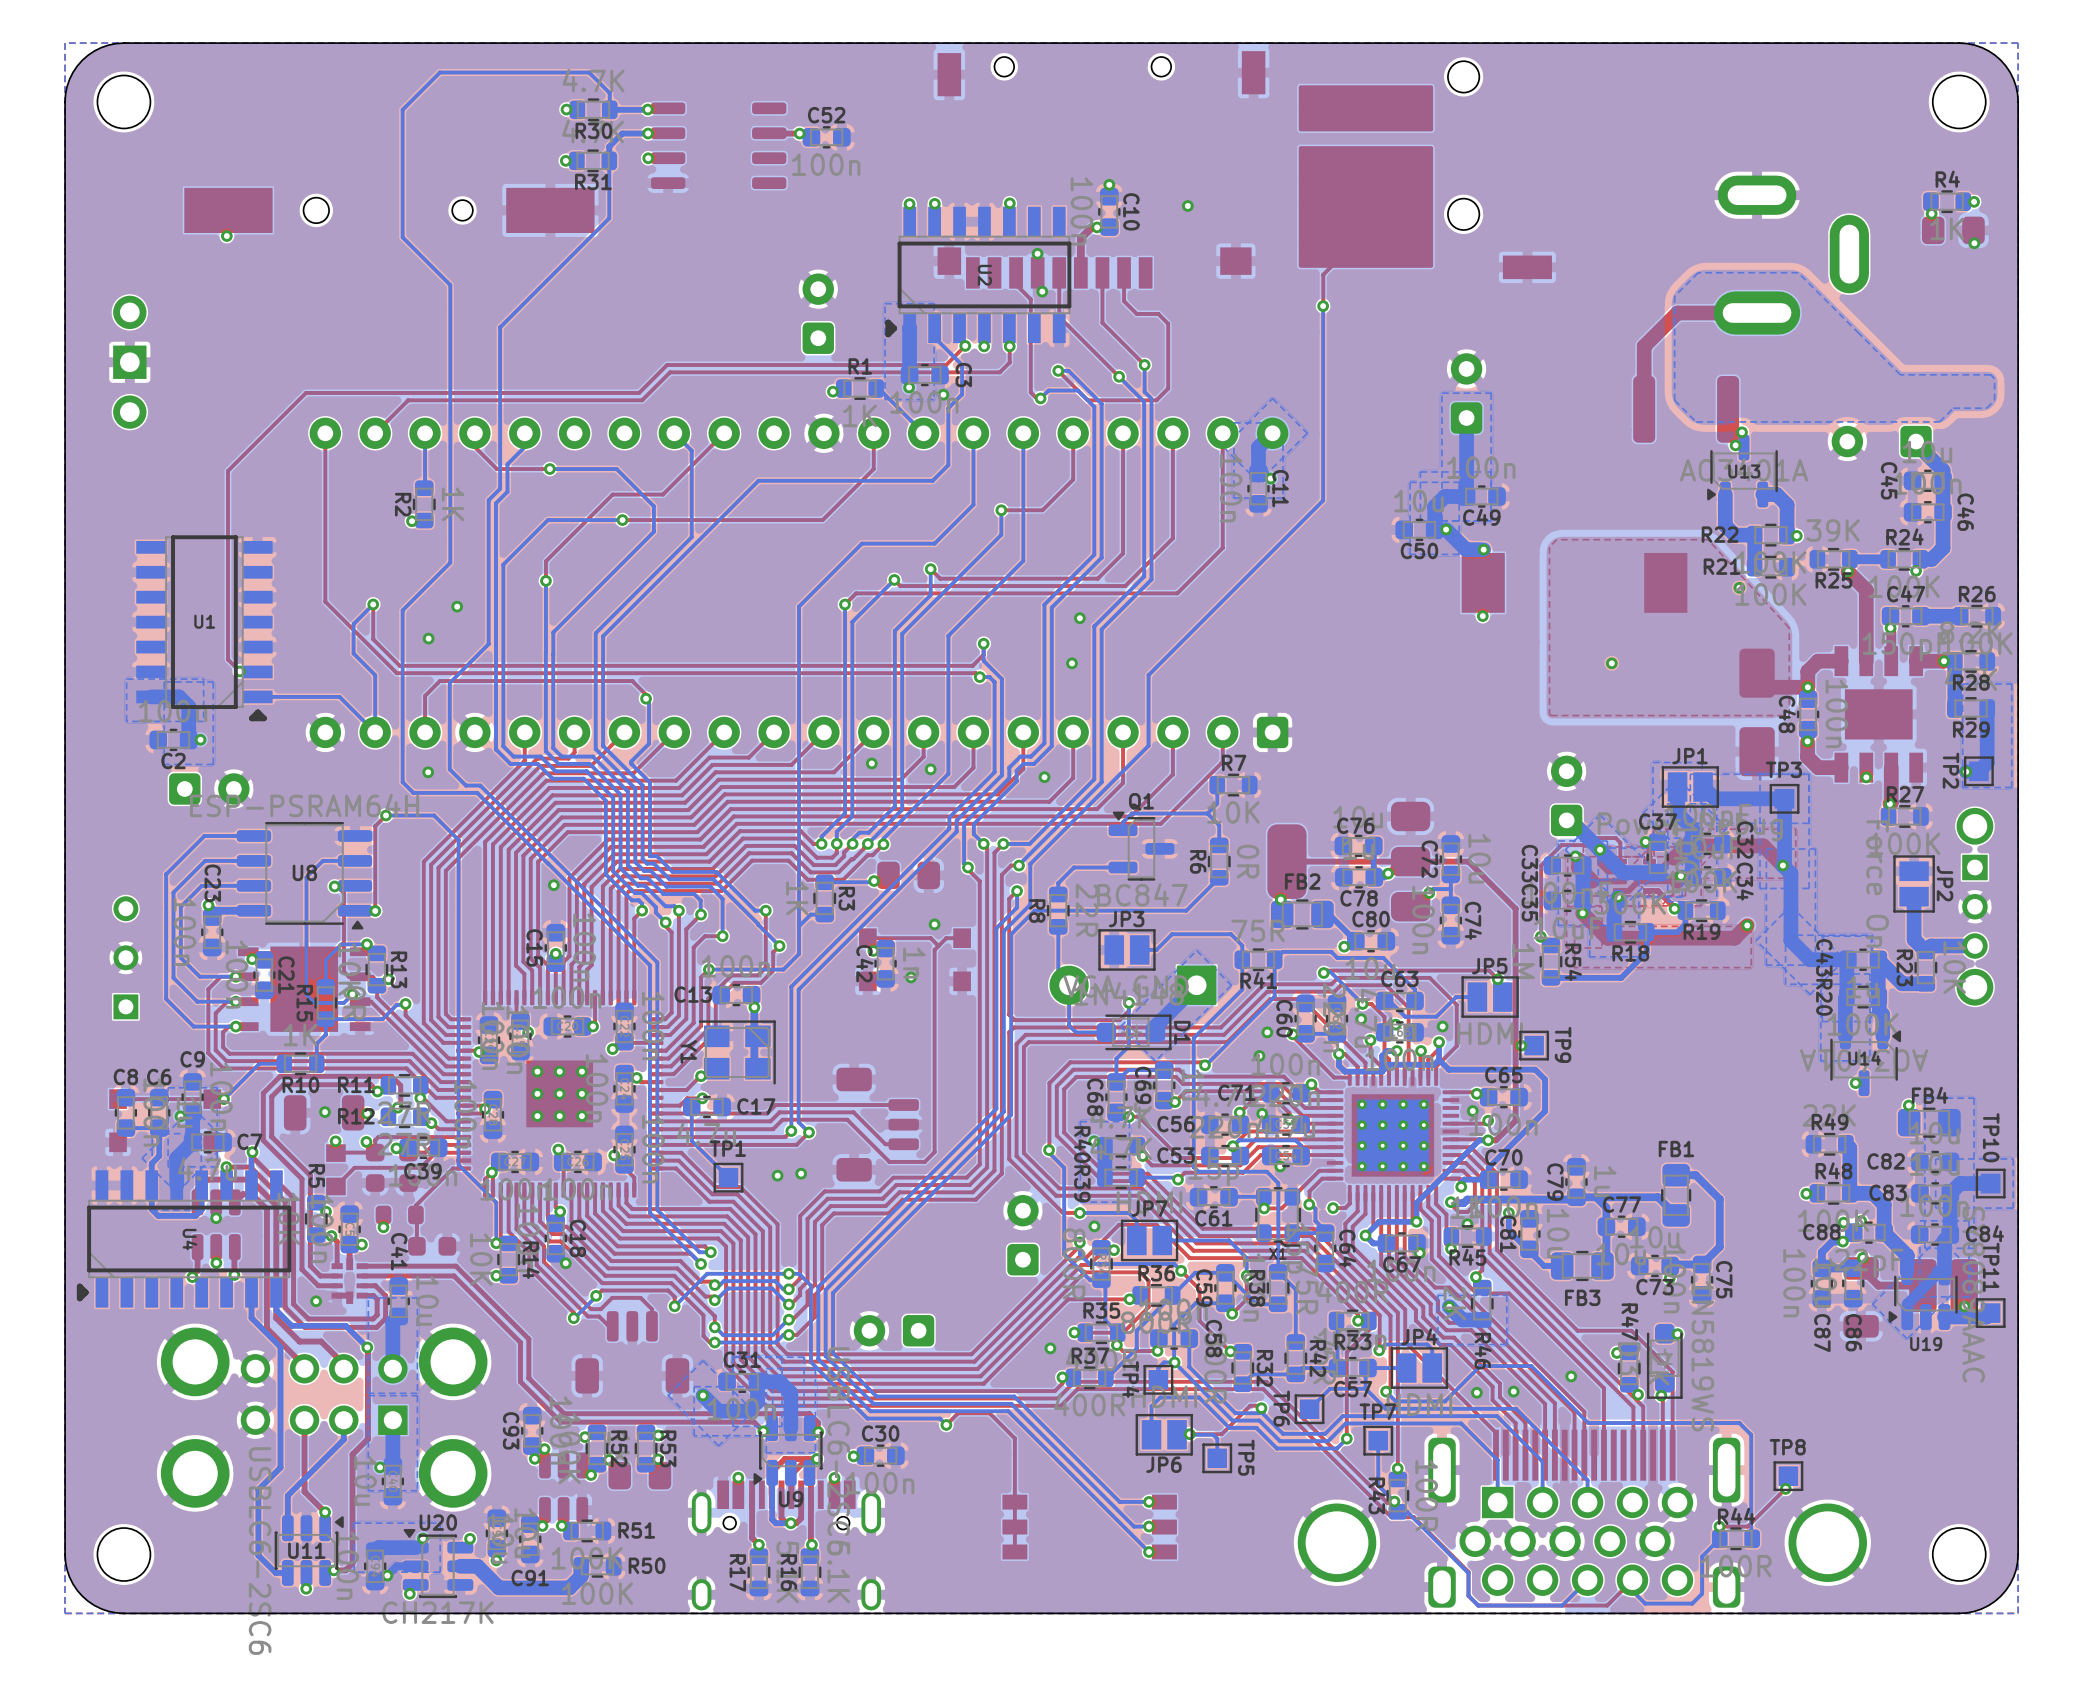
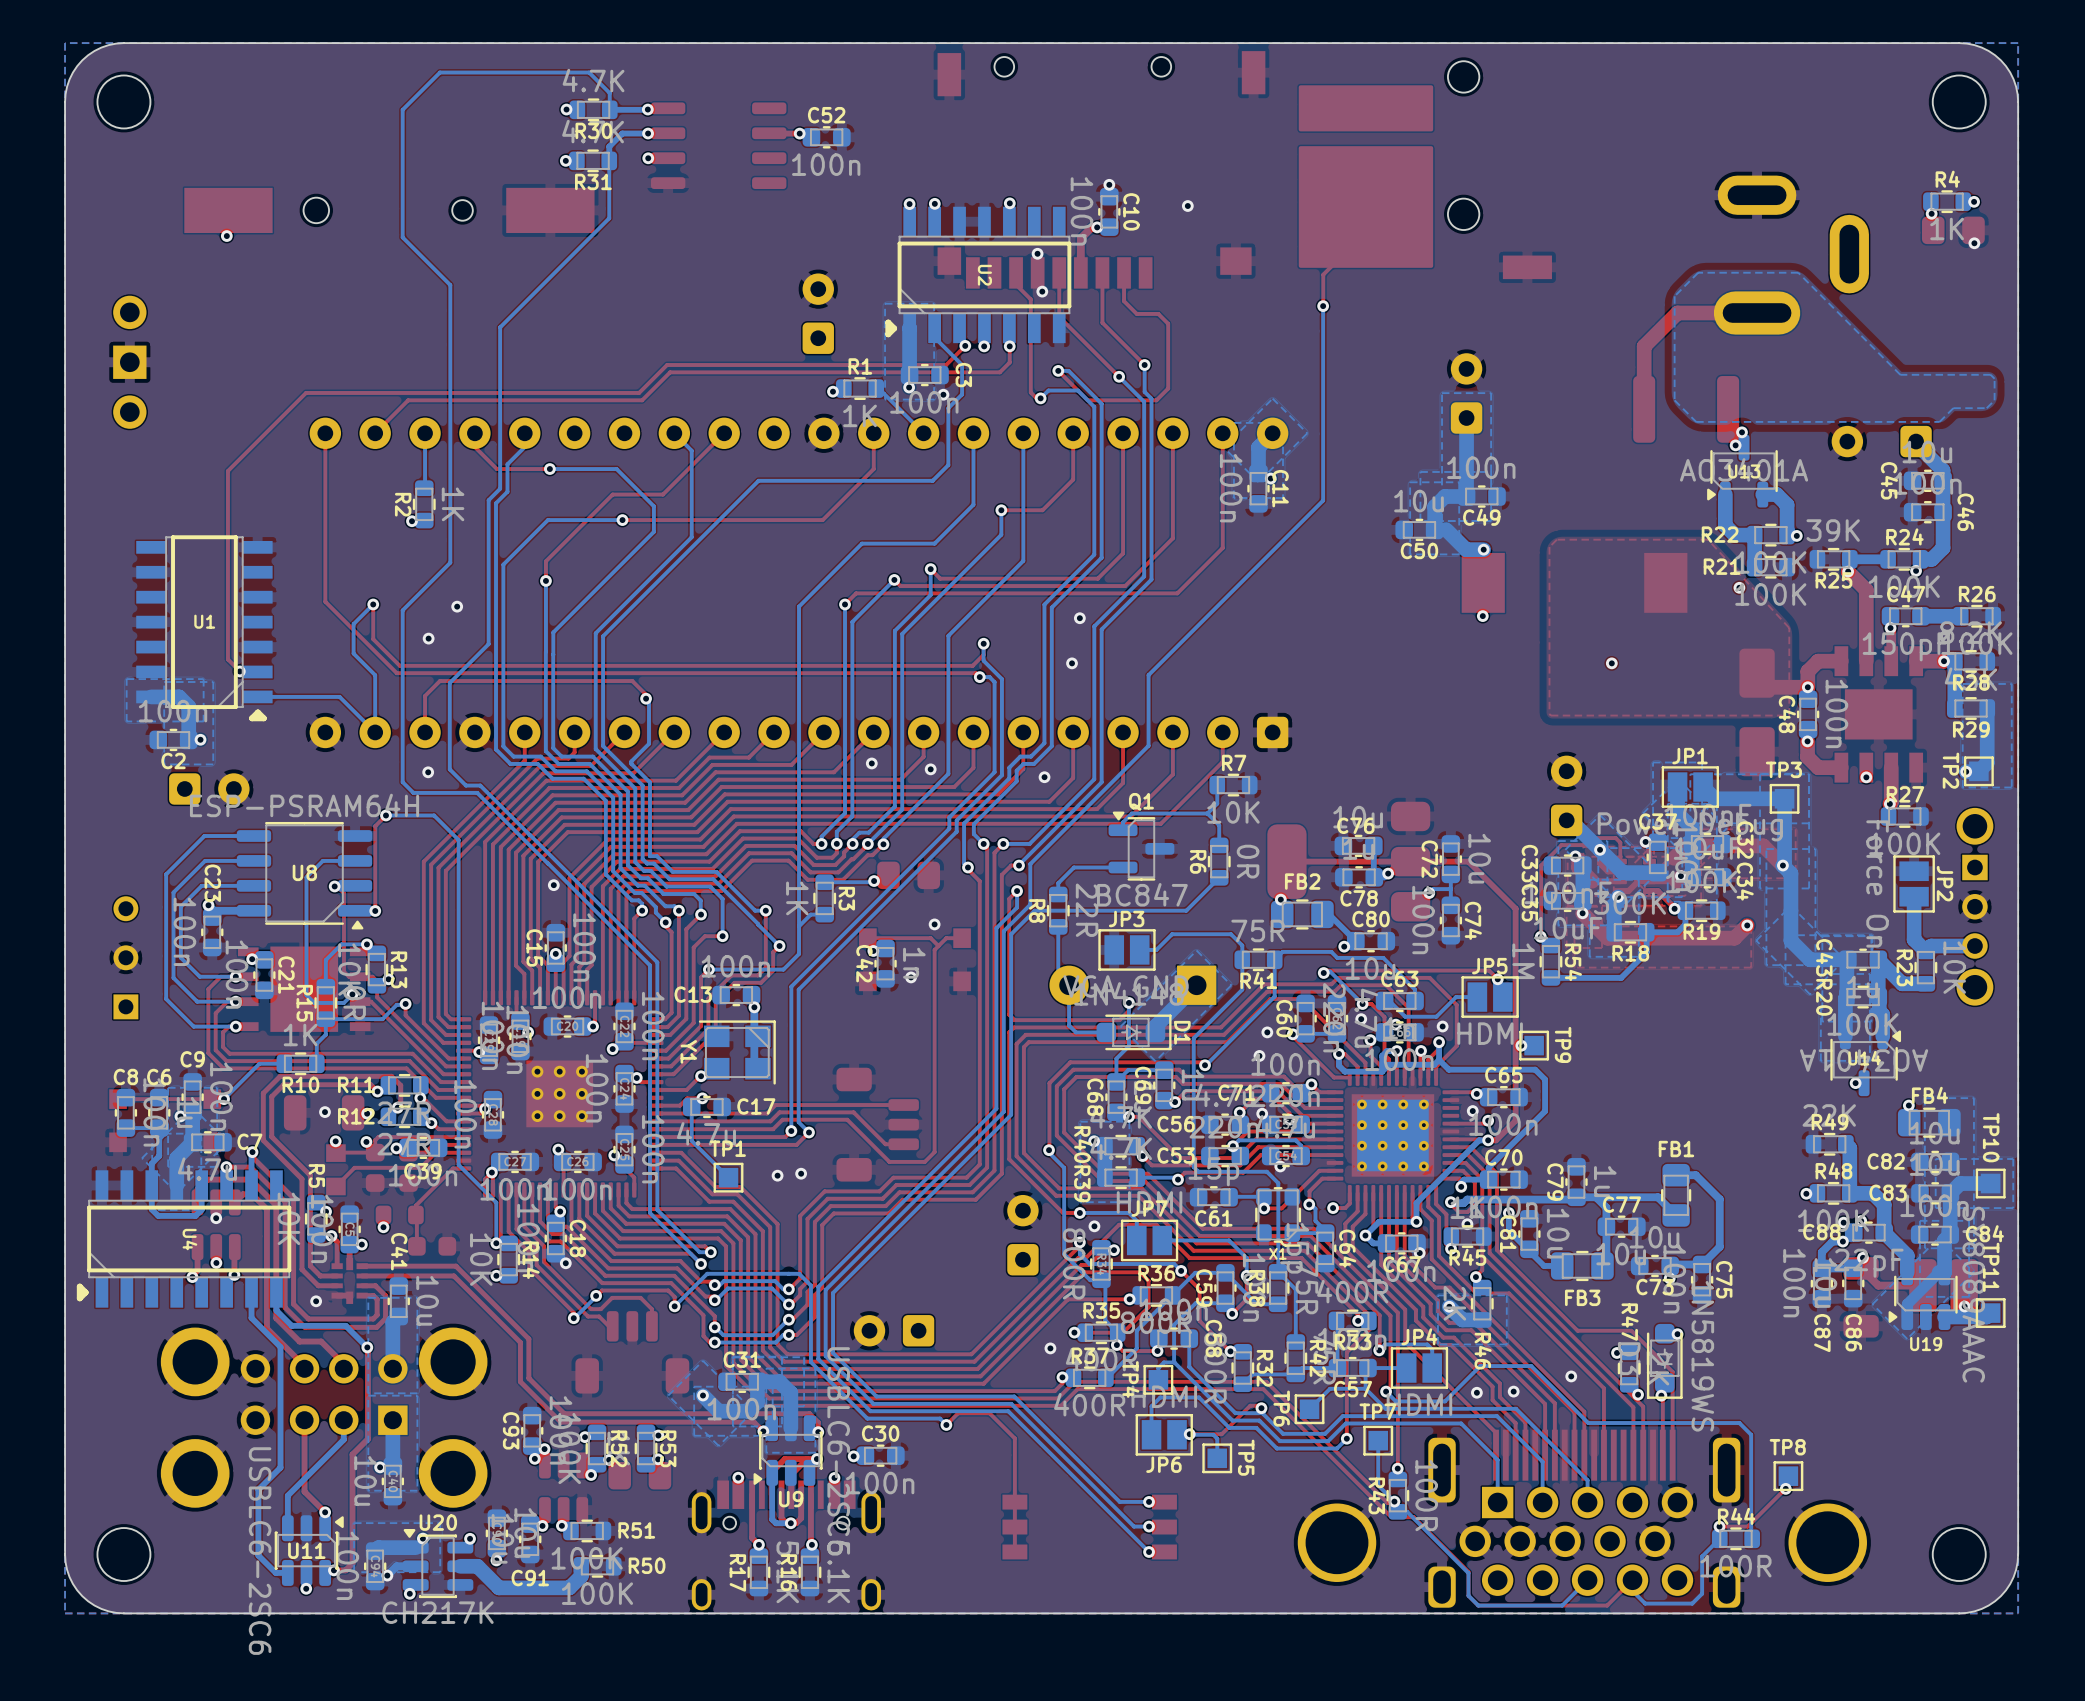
via: (1446, 529) -> none
via: (788, 1273) -> none
via: (1174, 1362) -> none

